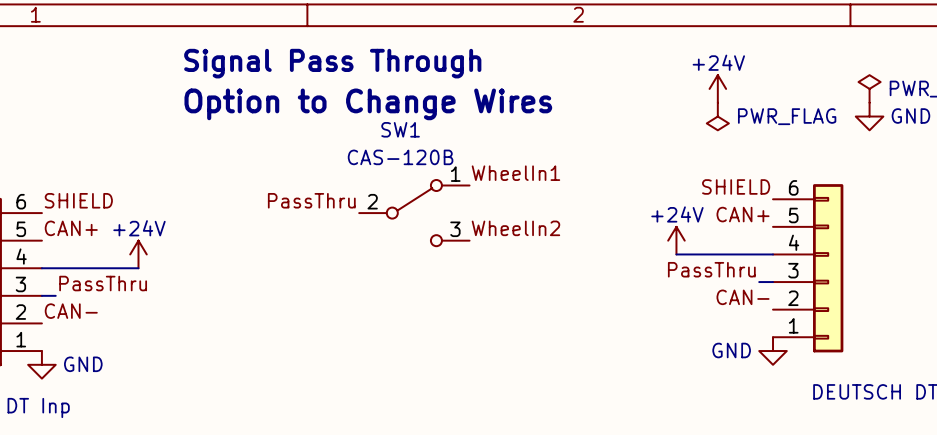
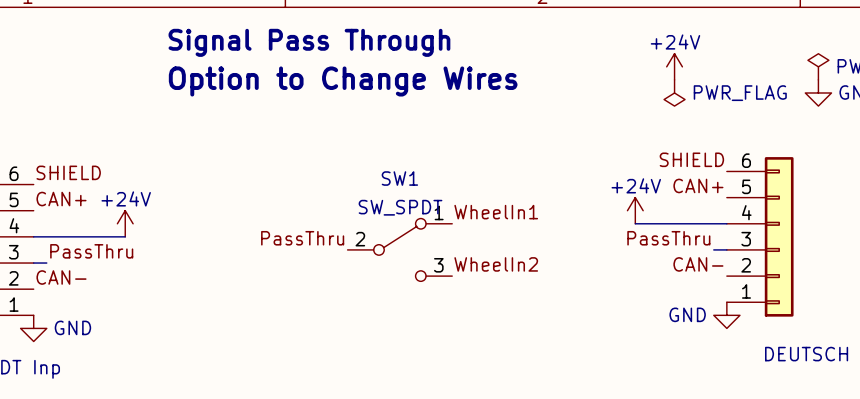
SW1 name position: SW1 (400, 129) -> SW1 (399, 178)
SW1 value: CAS-120B (400, 157) -> SW_SPDT (400, 207)
label position: WheelIn1 (515, 173) -> WheelIn1 (496, 212)
label position: PassThru (311, 200) -> PassThru (302, 238)
SW1 position: (414, 213) -> (399, 249)
label position: WheelIn2 (515, 228) -> WheelIn2 (496, 264)

